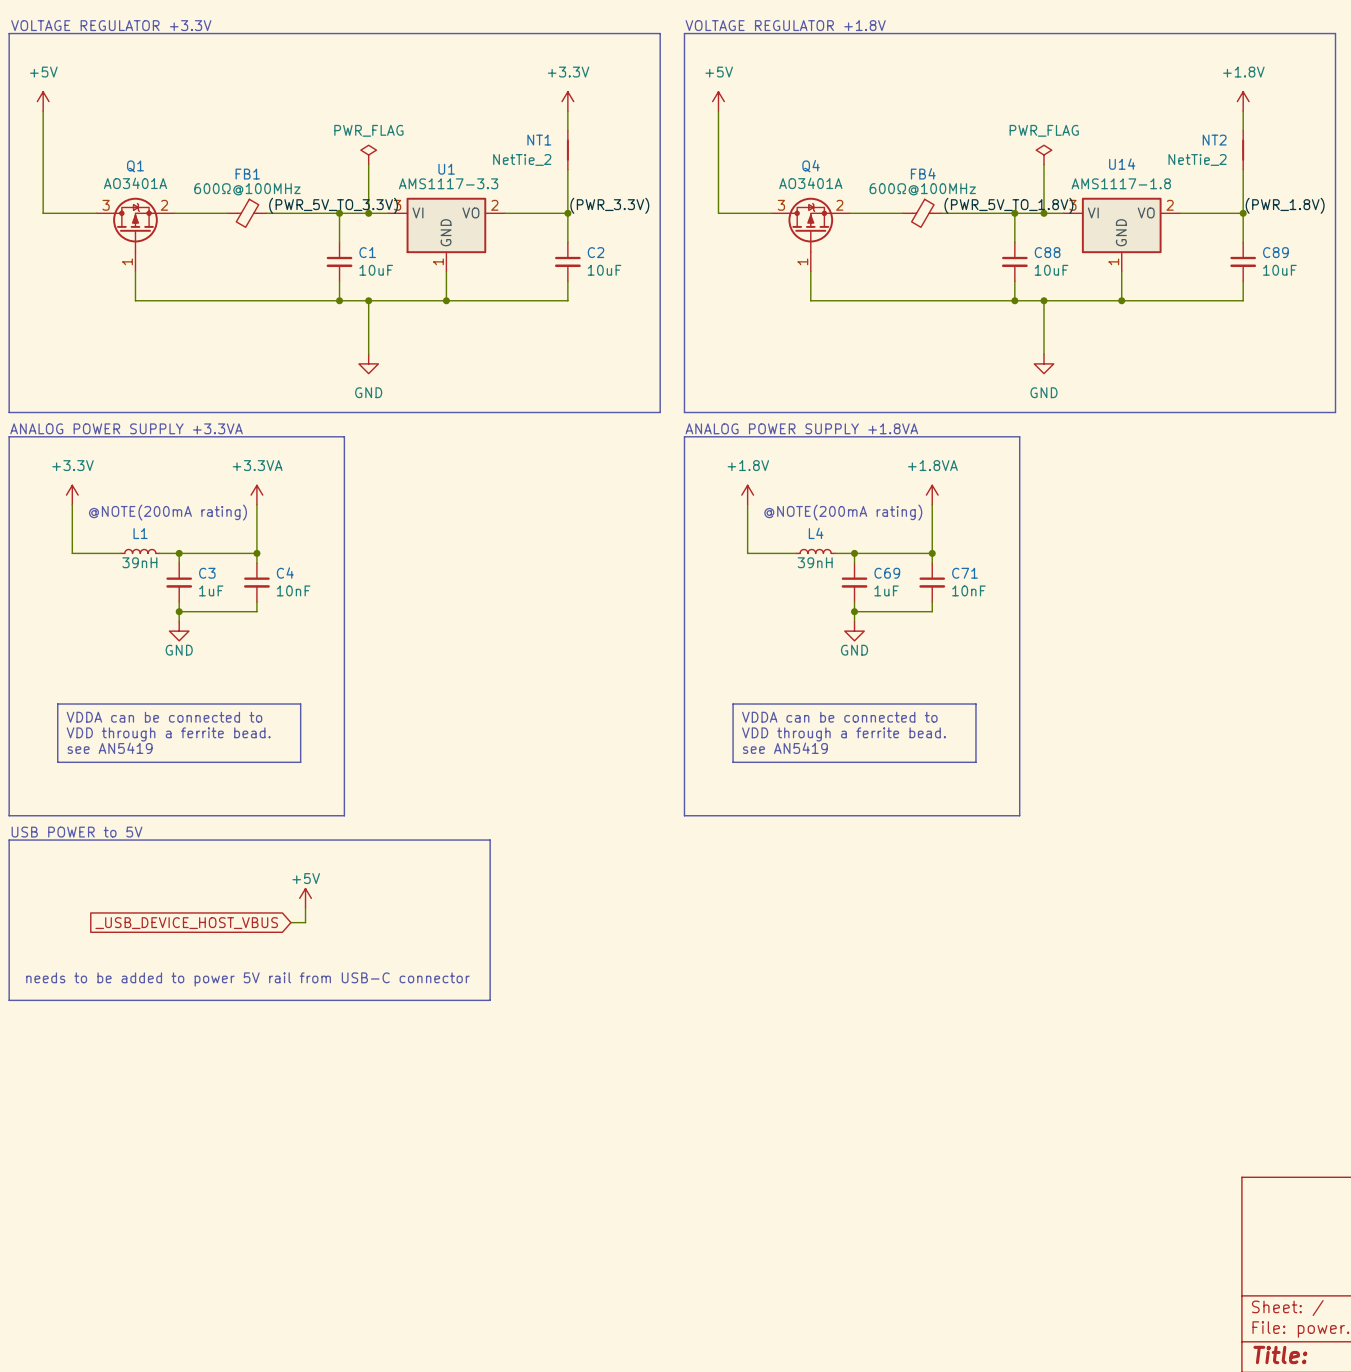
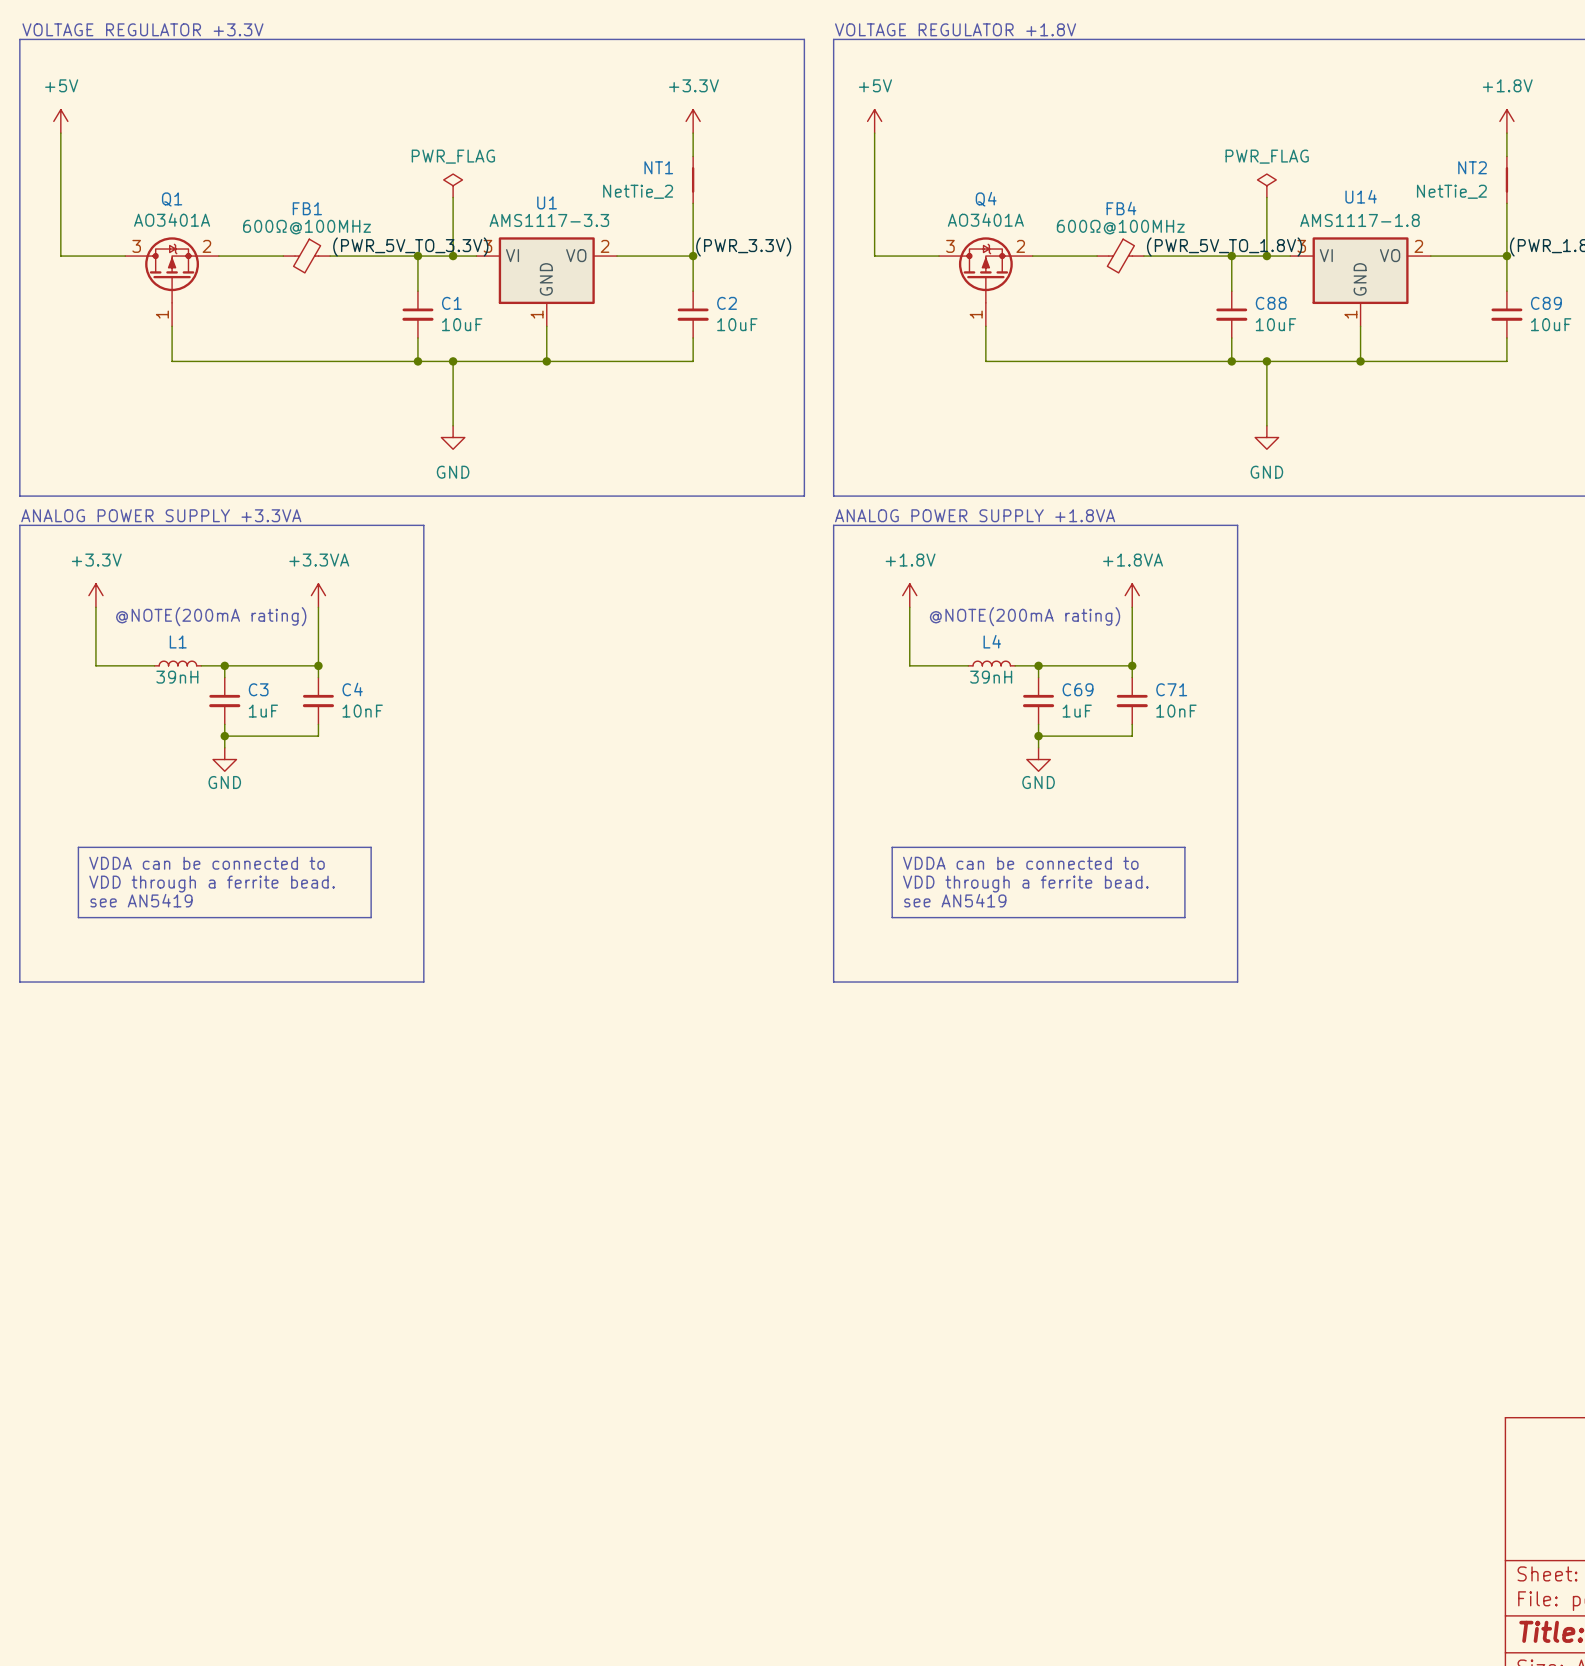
text: USB POWER to 5V (77, 832) -> none
line: (9, 840) (490, 840) (490, 1000) (9, 1000) (9, 840) -> none
power symbol: +5V (305, 898) -> none
wire: (305, 908) (305, 922) (290, 922) -> none
global label: _USB_DEVICE_HOST_VBUS (186, 923) -> none
text: needs to be added to power 5V rail from USB-C connector (247, 979) -> none

